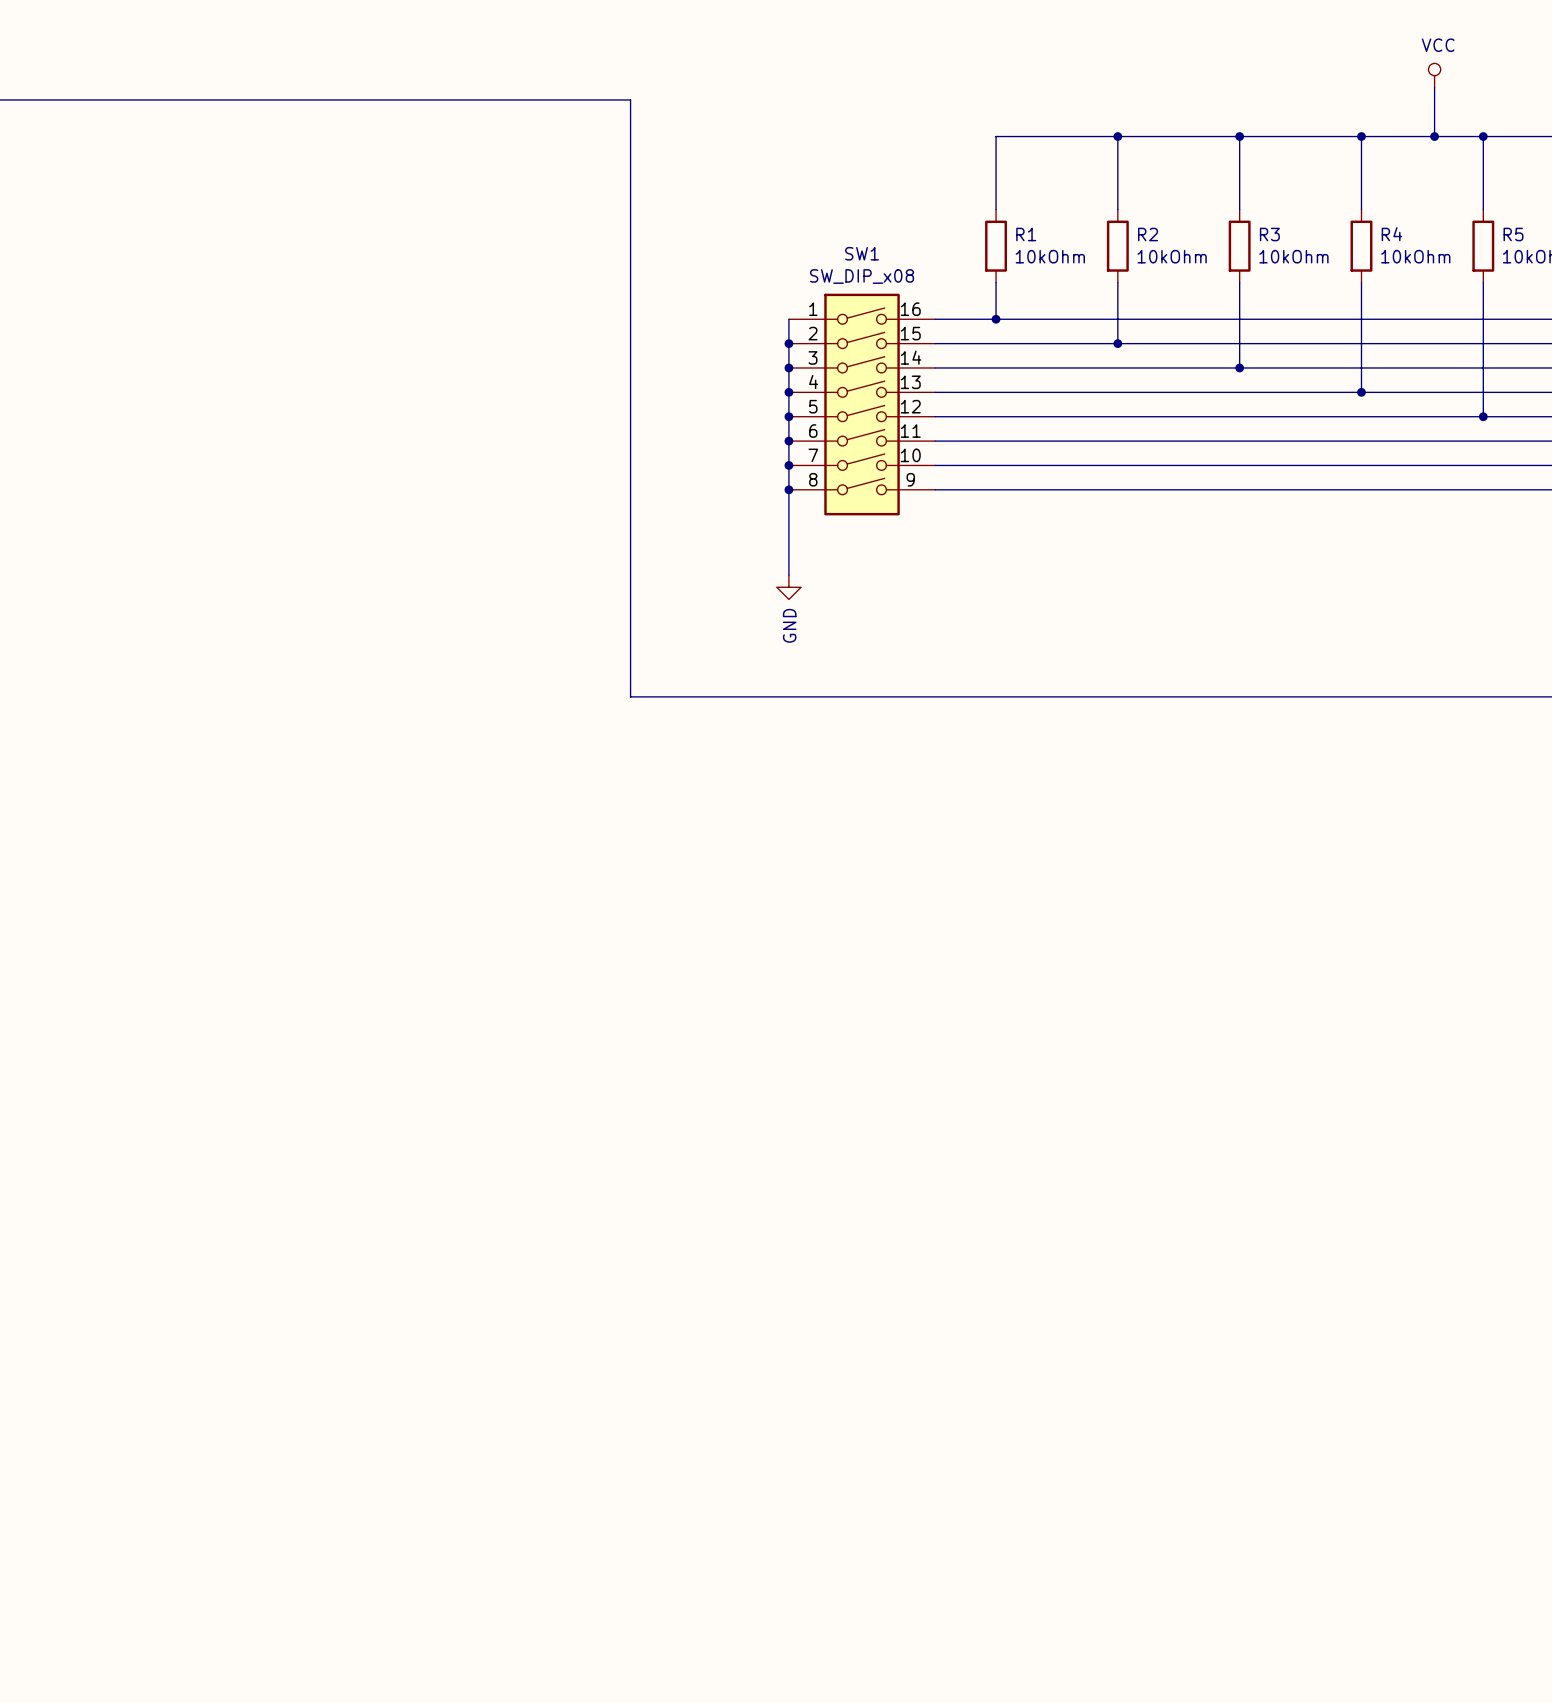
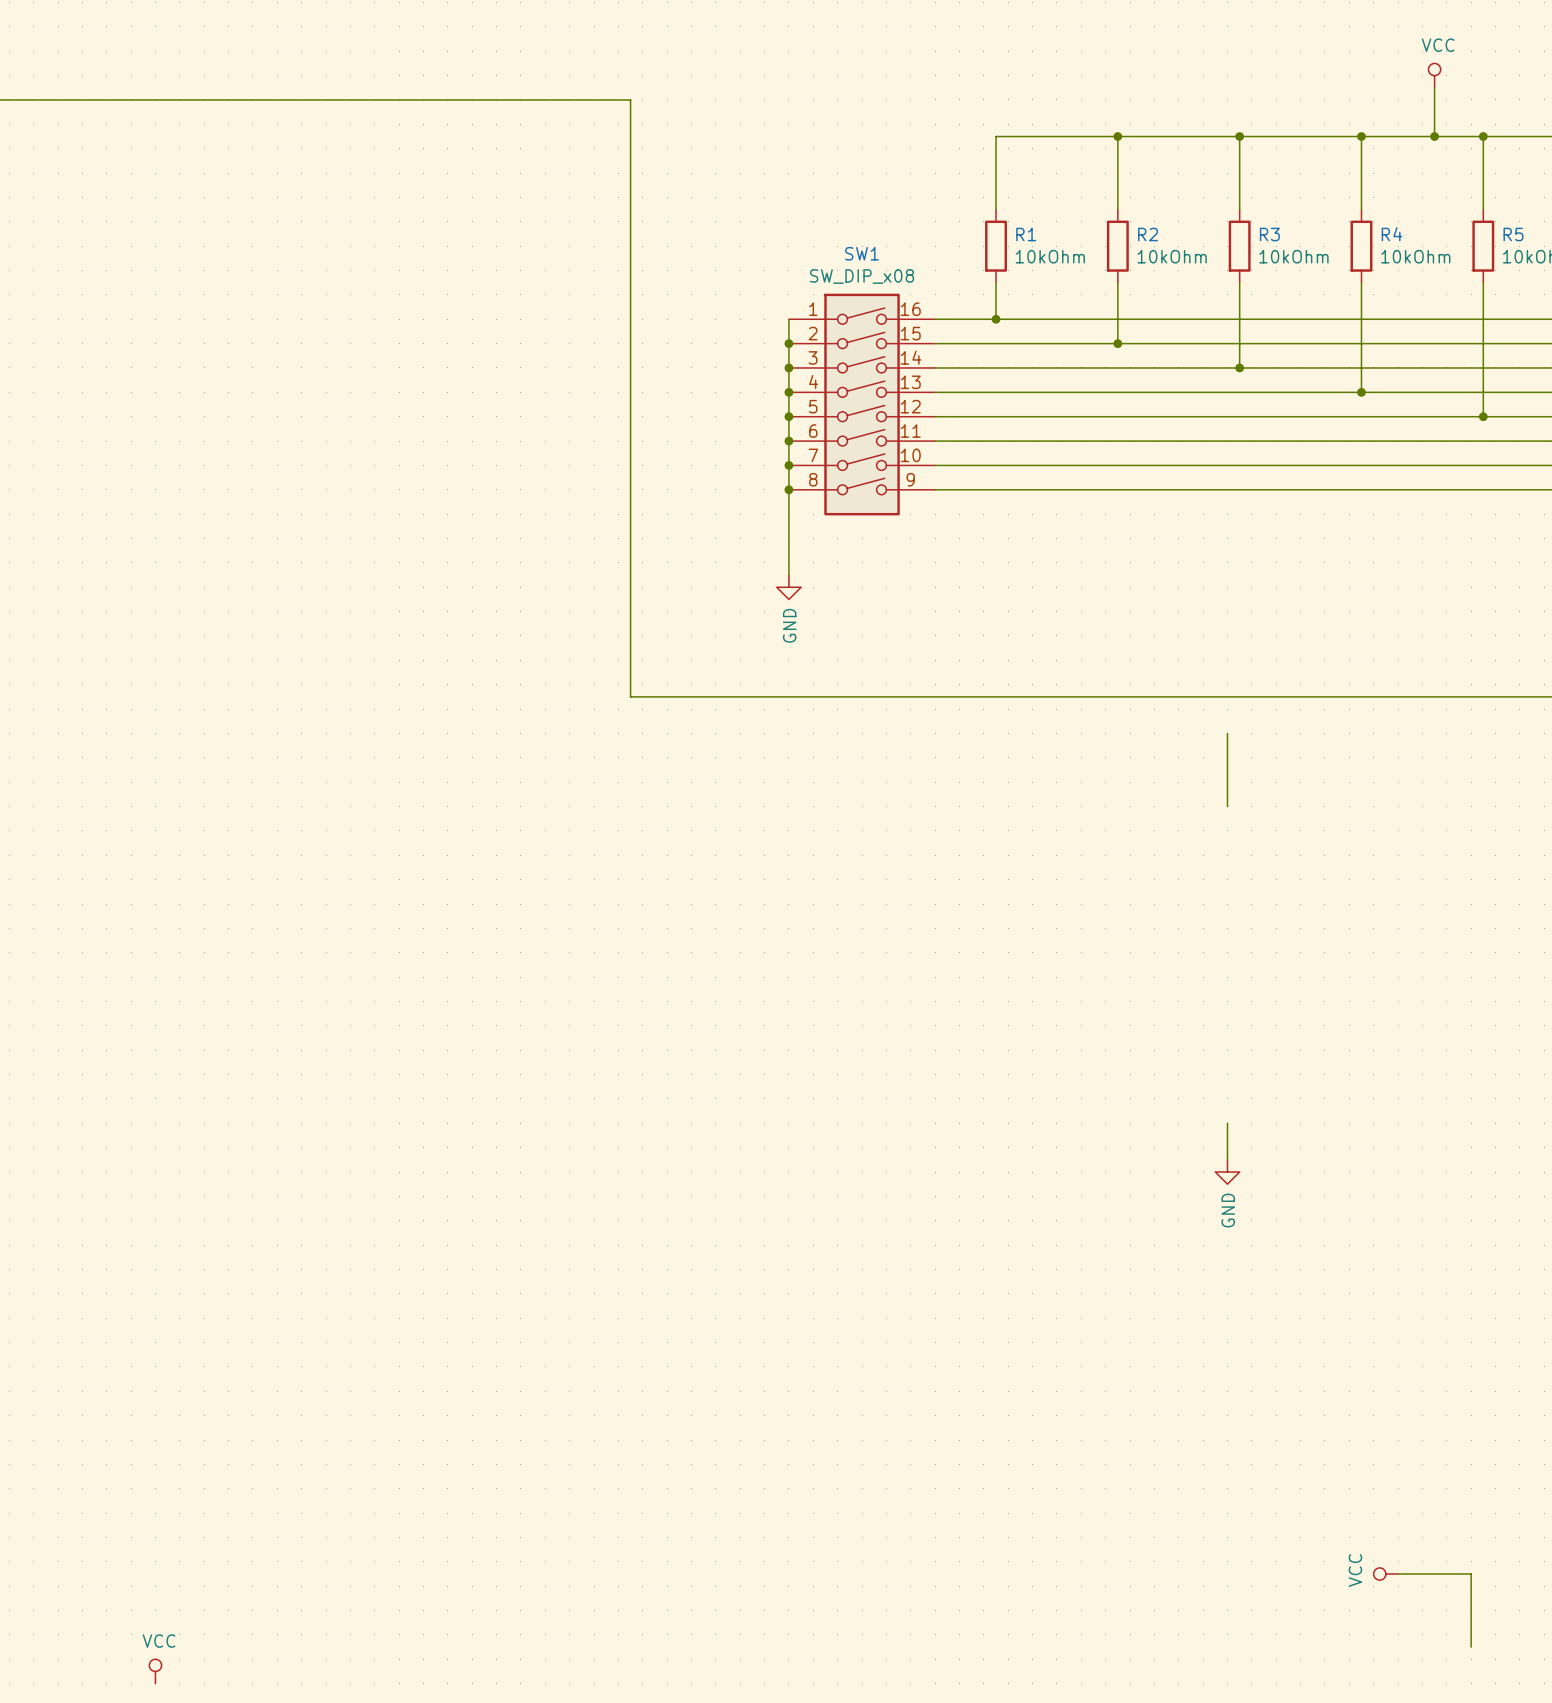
wire: none -> (1227, 733) (1227, 806)
wire: none -> (1227, 1123) (1227, 1159)
power symbol: none -> GND (1227, 1172)
power symbol: none -> VCC (1385, 1574)
wire: none -> (1398, 1574) (1471, 1574) (1471, 1647)
power symbol: none -> VCC (155, 1671)

